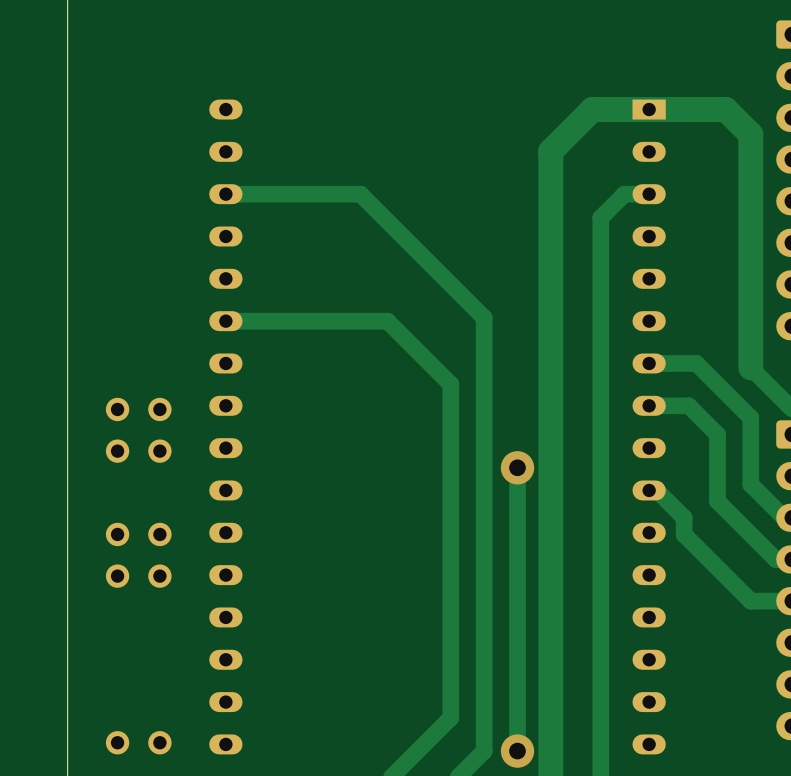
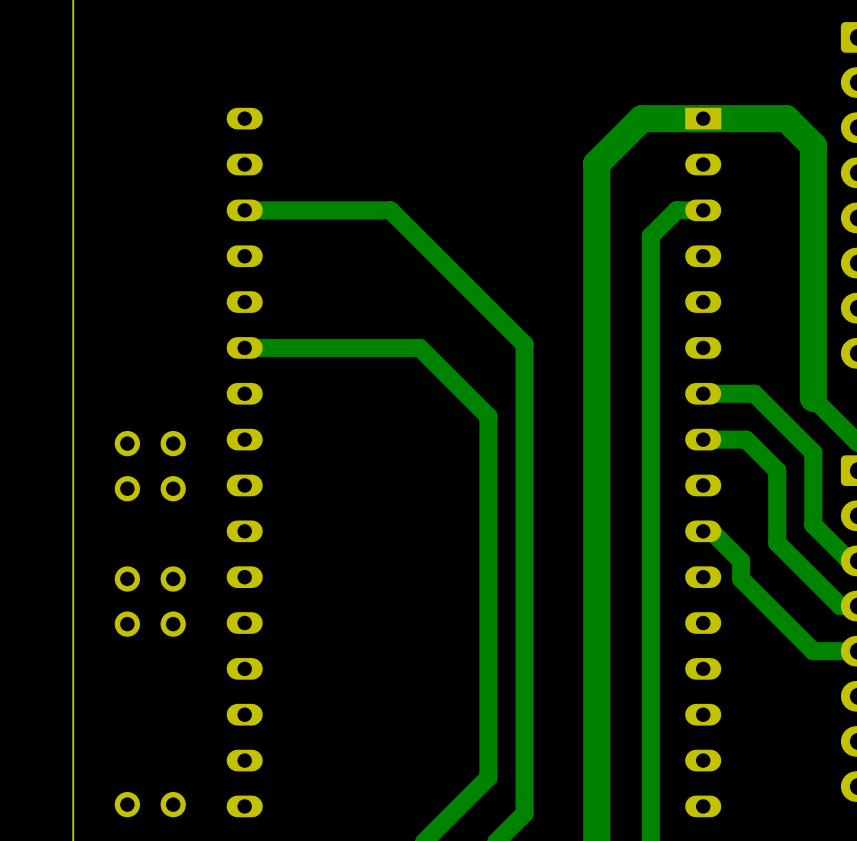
track: (517, 467) (517, 751) -> none
via: (517, 467) -> none
via: (517, 751) -> none

